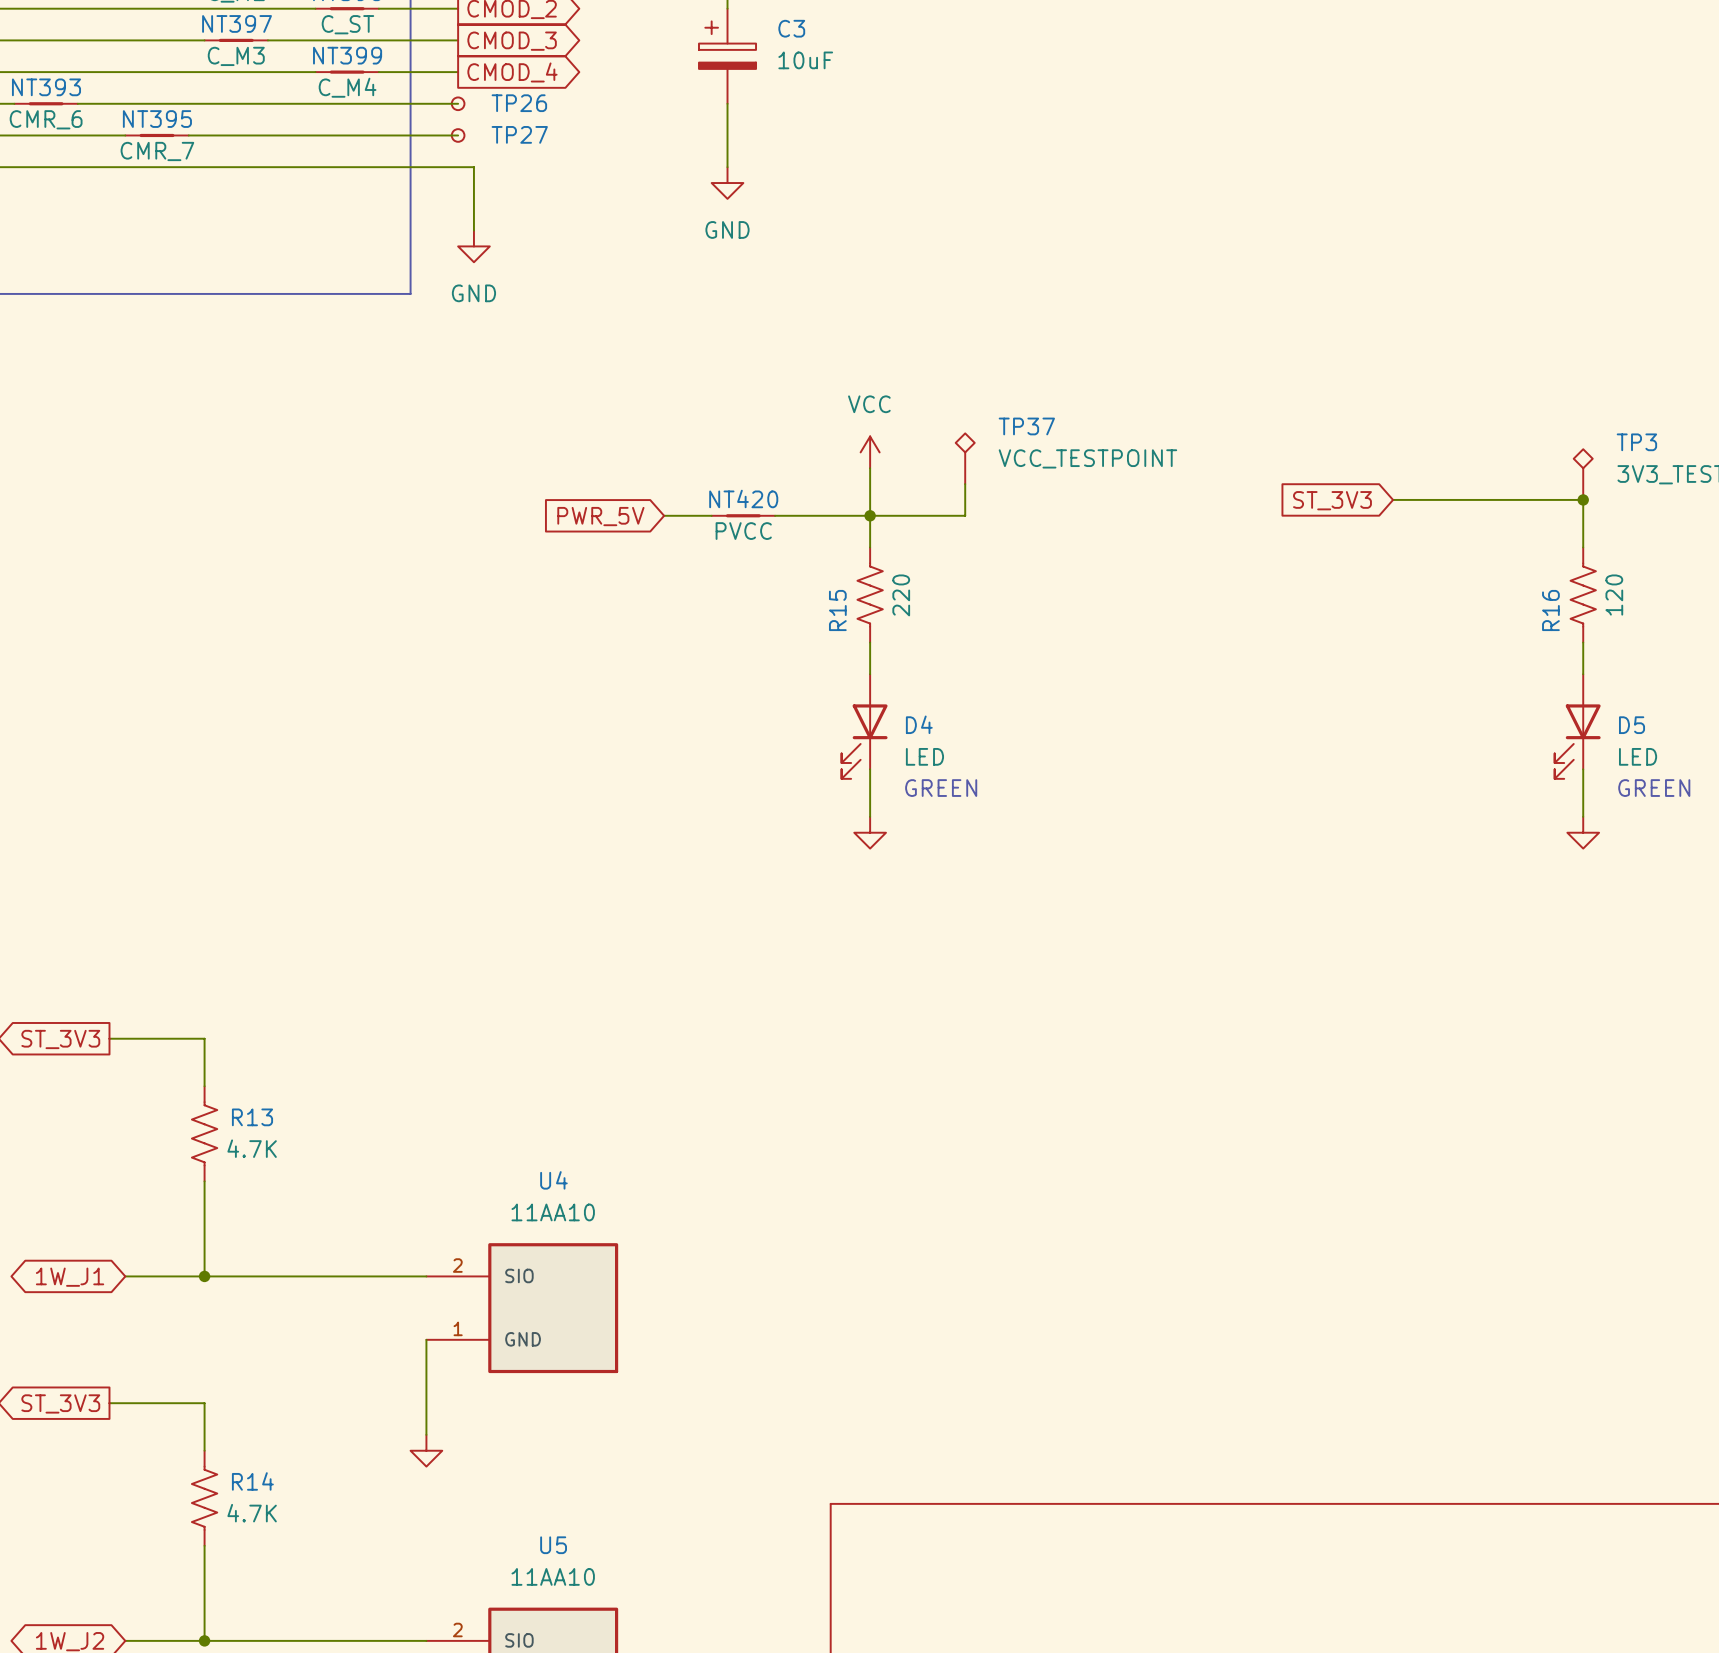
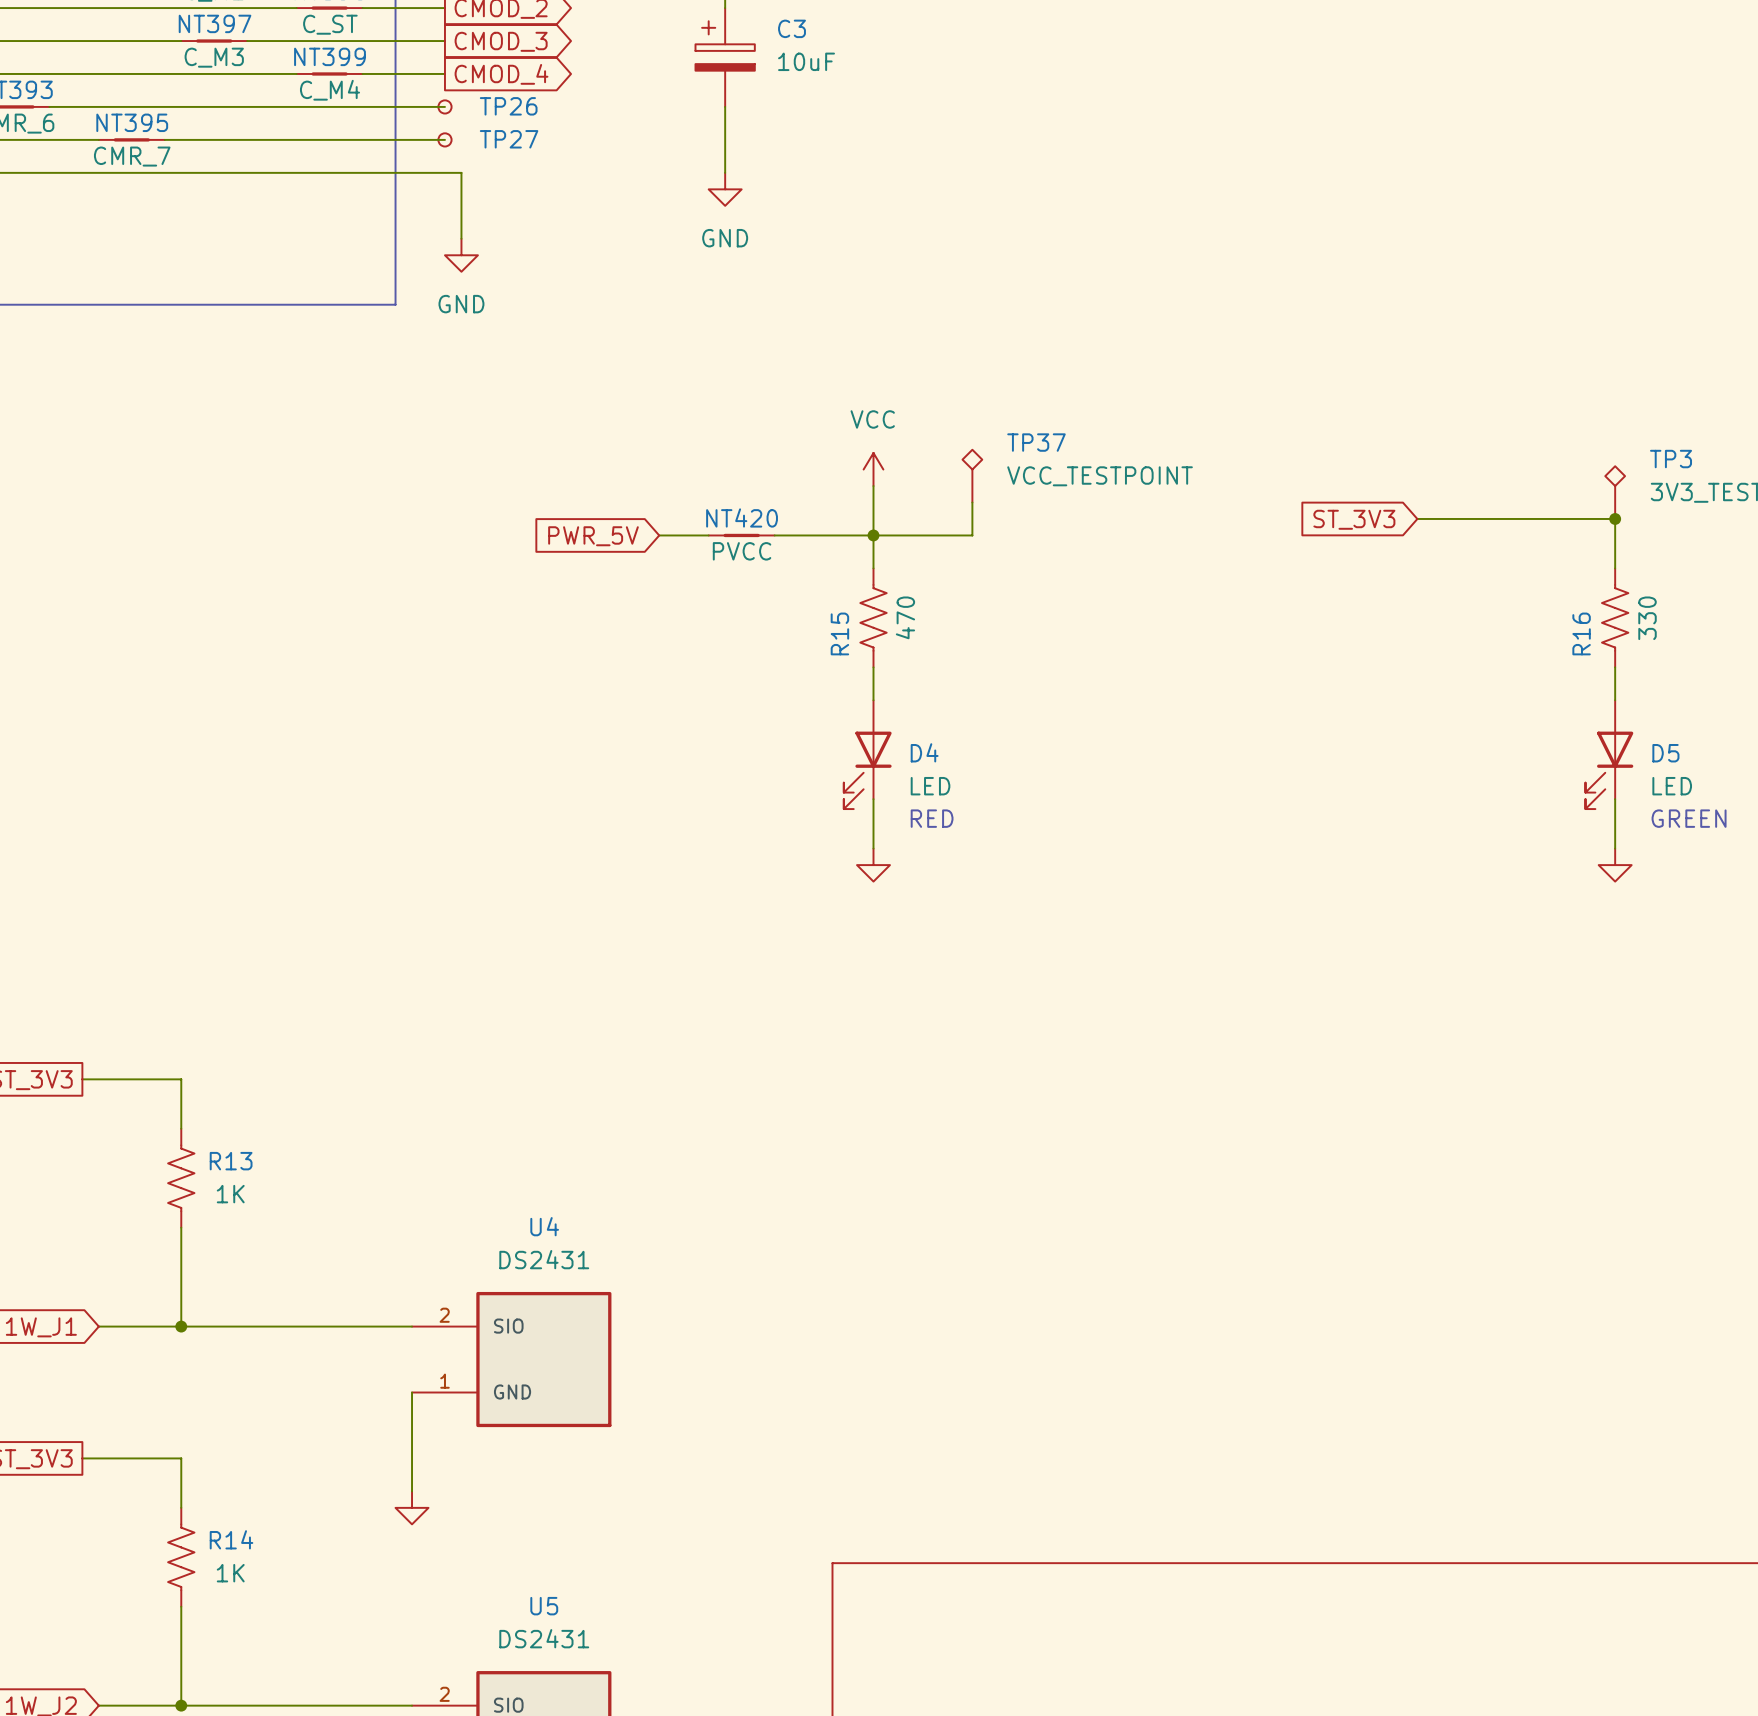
R15 value: 220 (901, 595) -> 470 (905, 617)
R16 value: 120 (1614, 595) -> 330 (1647, 618)
text: GREEN (941, 788) -> RED (932, 818)
R13 value: 4.7K (252, 1148) -> 1K (230, 1194)
U4 value: 11AA10 (553, 1212) -> DS2431 (544, 1259)
R14 value: 4.7K (252, 1513) -> 1K (230, 1573)
U5 value: 11AA10 (553, 1576) -> DS2431 (544, 1638)

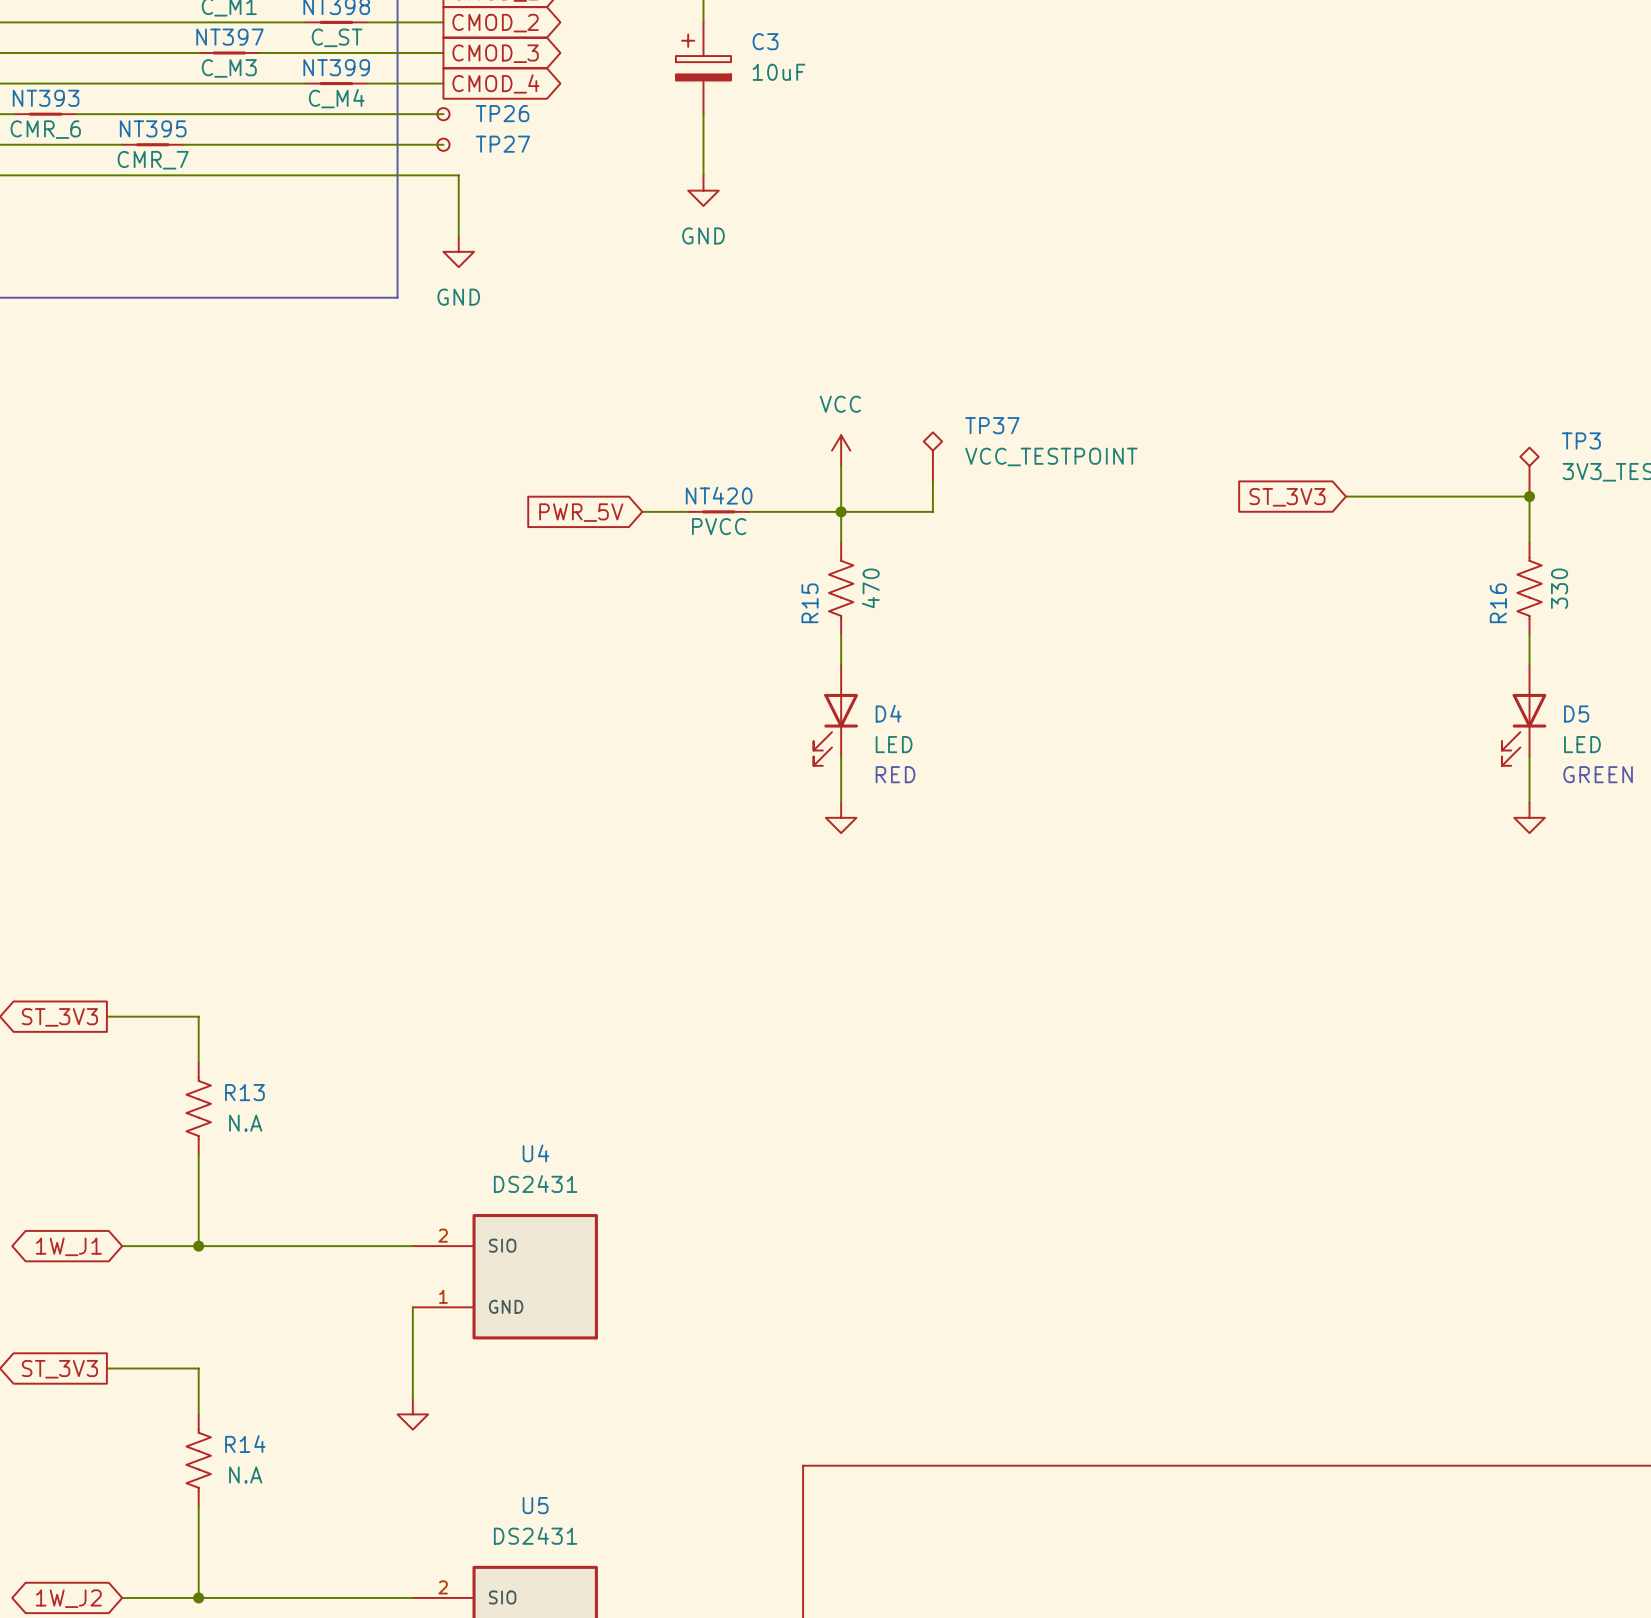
R13 value: 1K (230, 1194) -> N.A (245, 1123)
R14 value: 1K (230, 1573) -> N.A (245, 1475)

